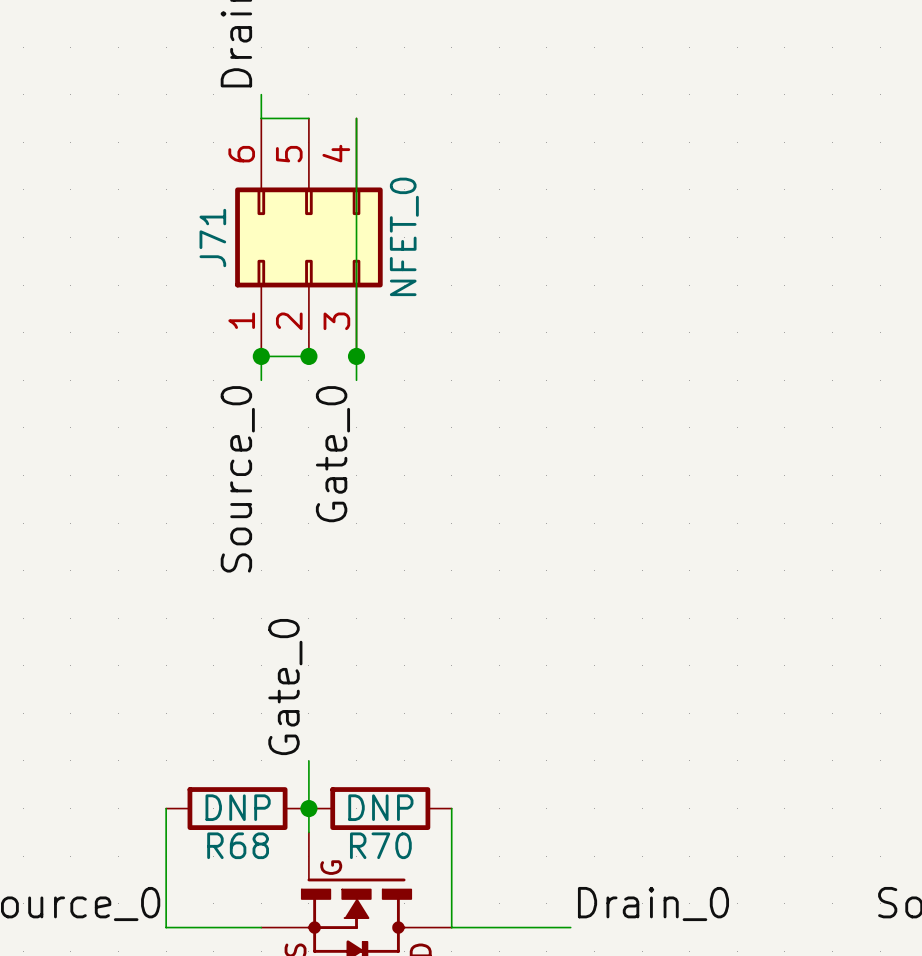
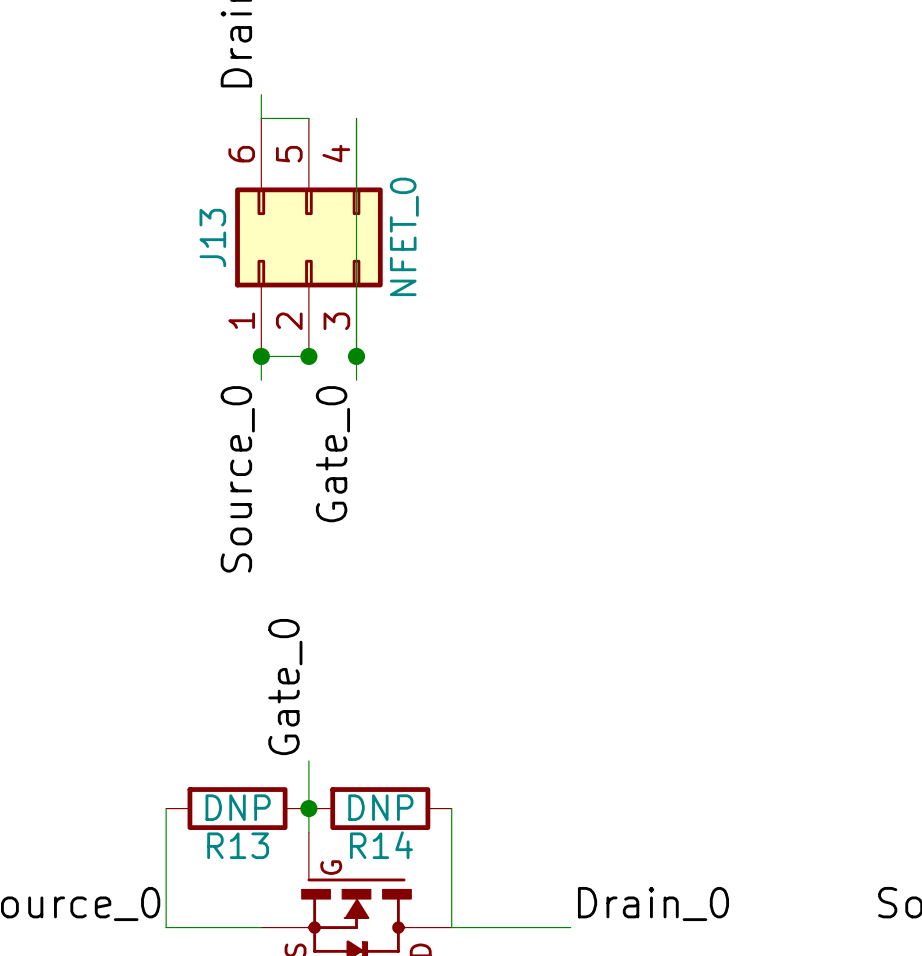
J71 name: J71 (212, 238) -> J13 (212, 238)
R68 name: R68 (238, 845) -> R13 (238, 845)
R70 name: R70 (380, 845) -> R14 (381, 845)

